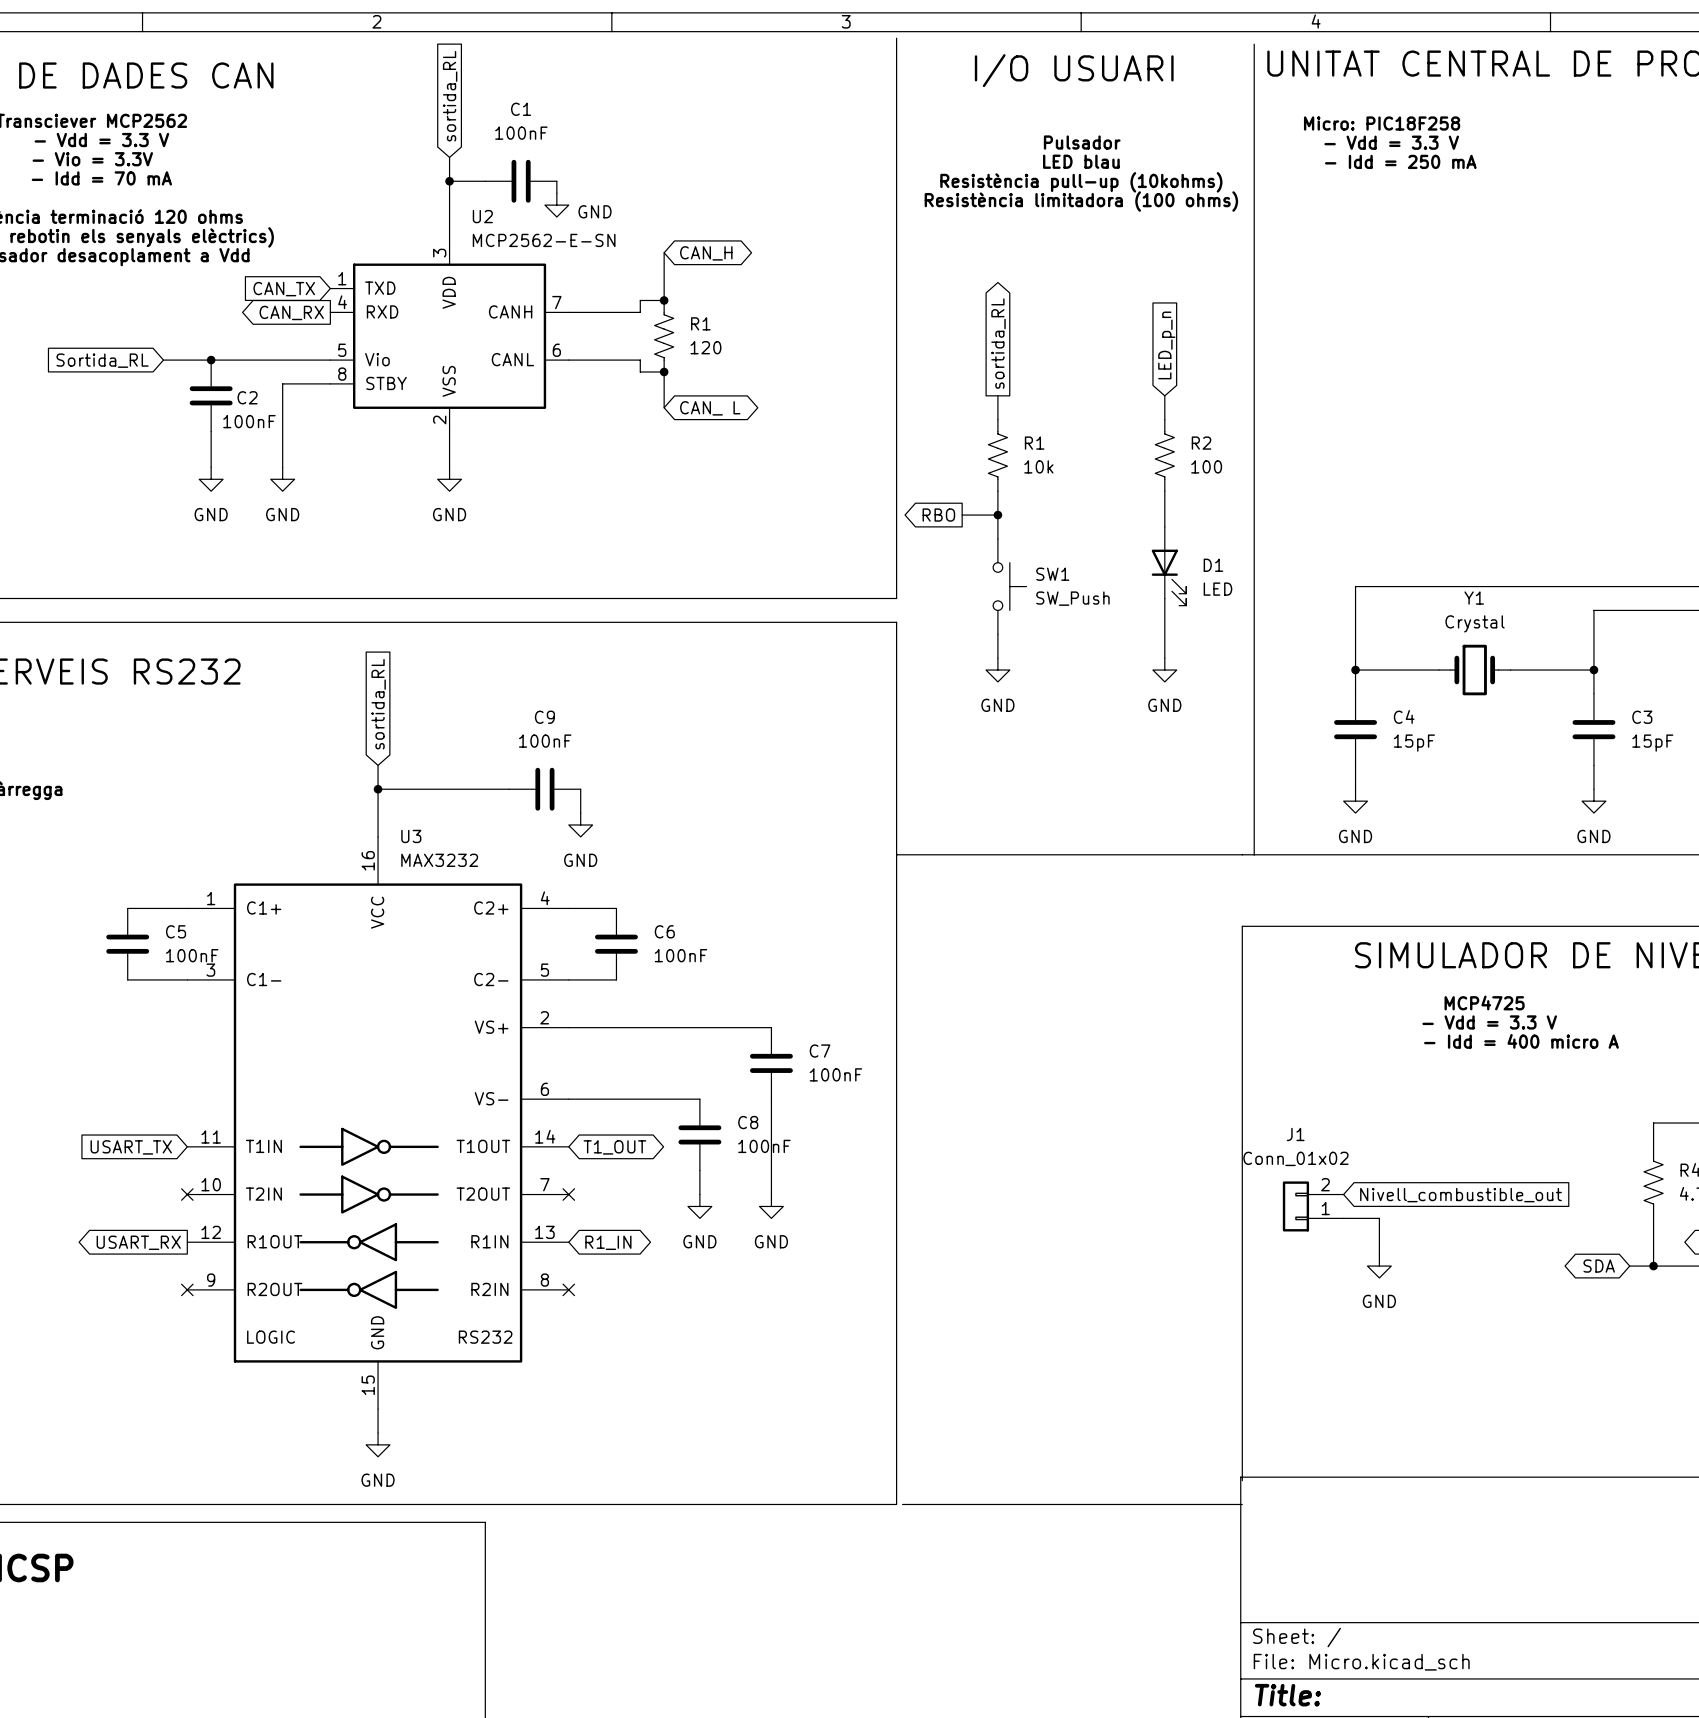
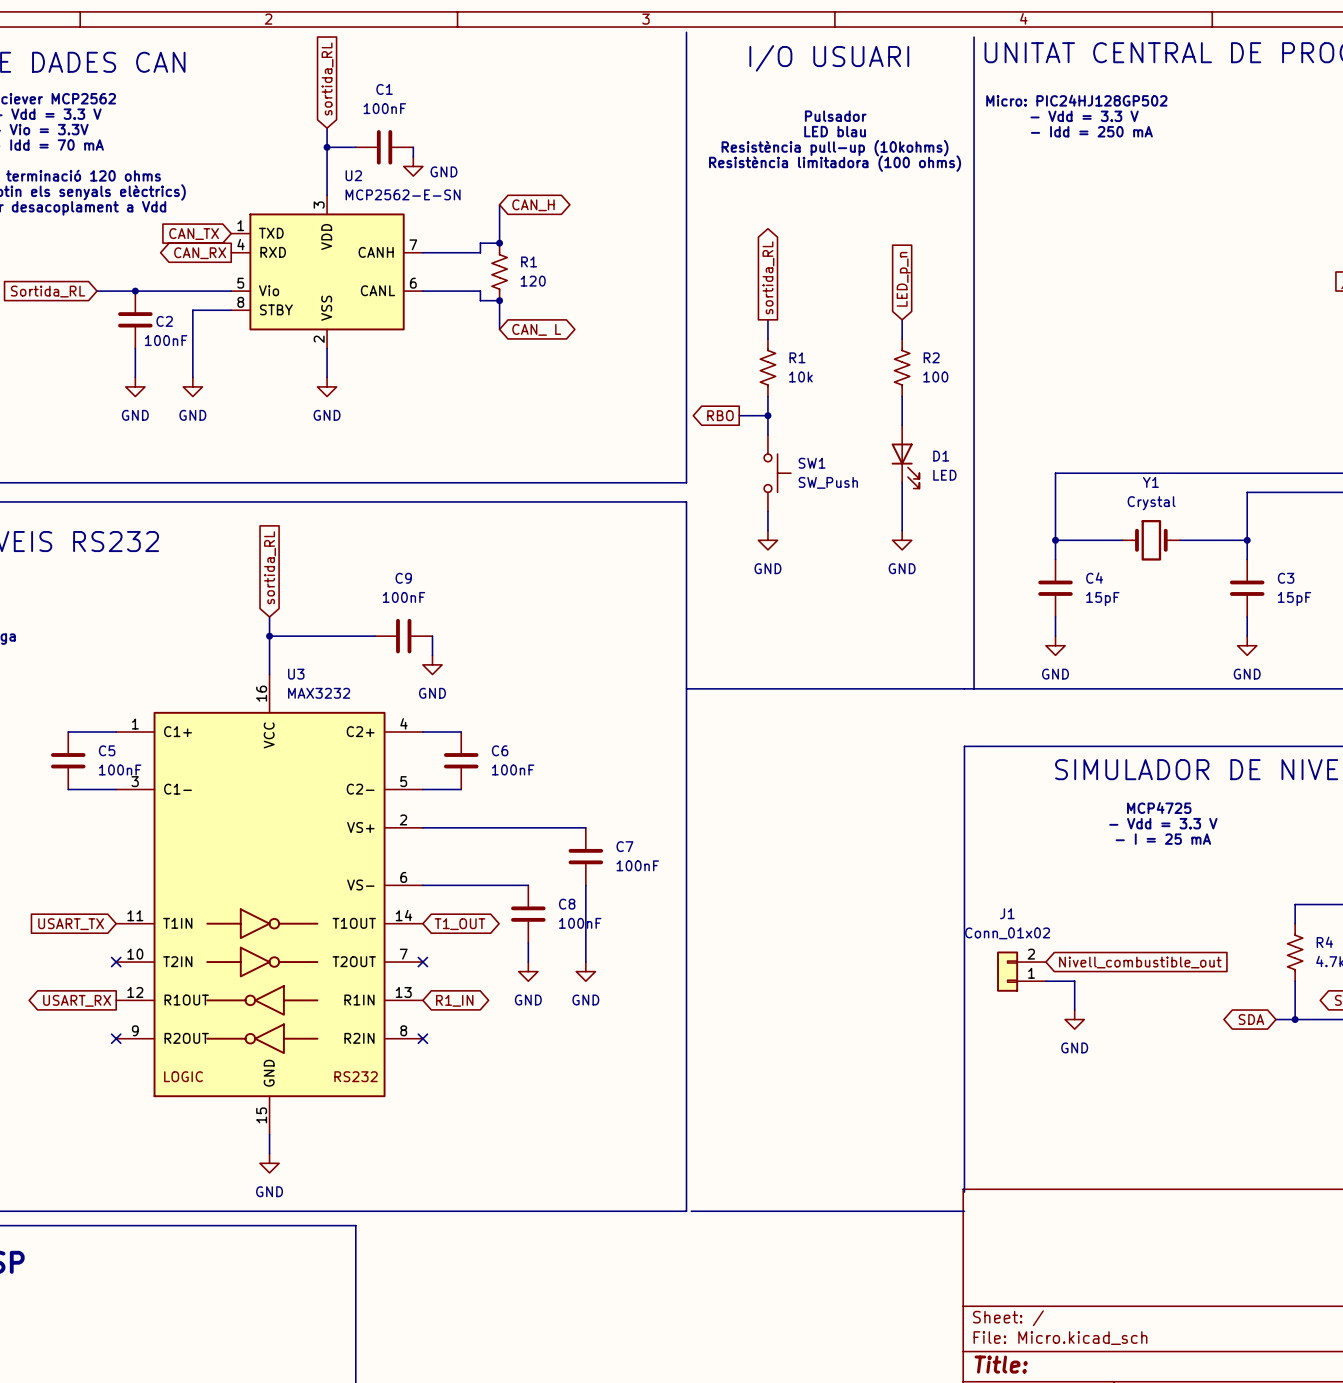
text: Micro: PIC18F258 (1382, 123) -> Micro: PIC24HJ128GP502 (1076, 100)
text: - Idd = 400 micro A (1521, 1041) -> - I = 25 mA (1163, 839)

